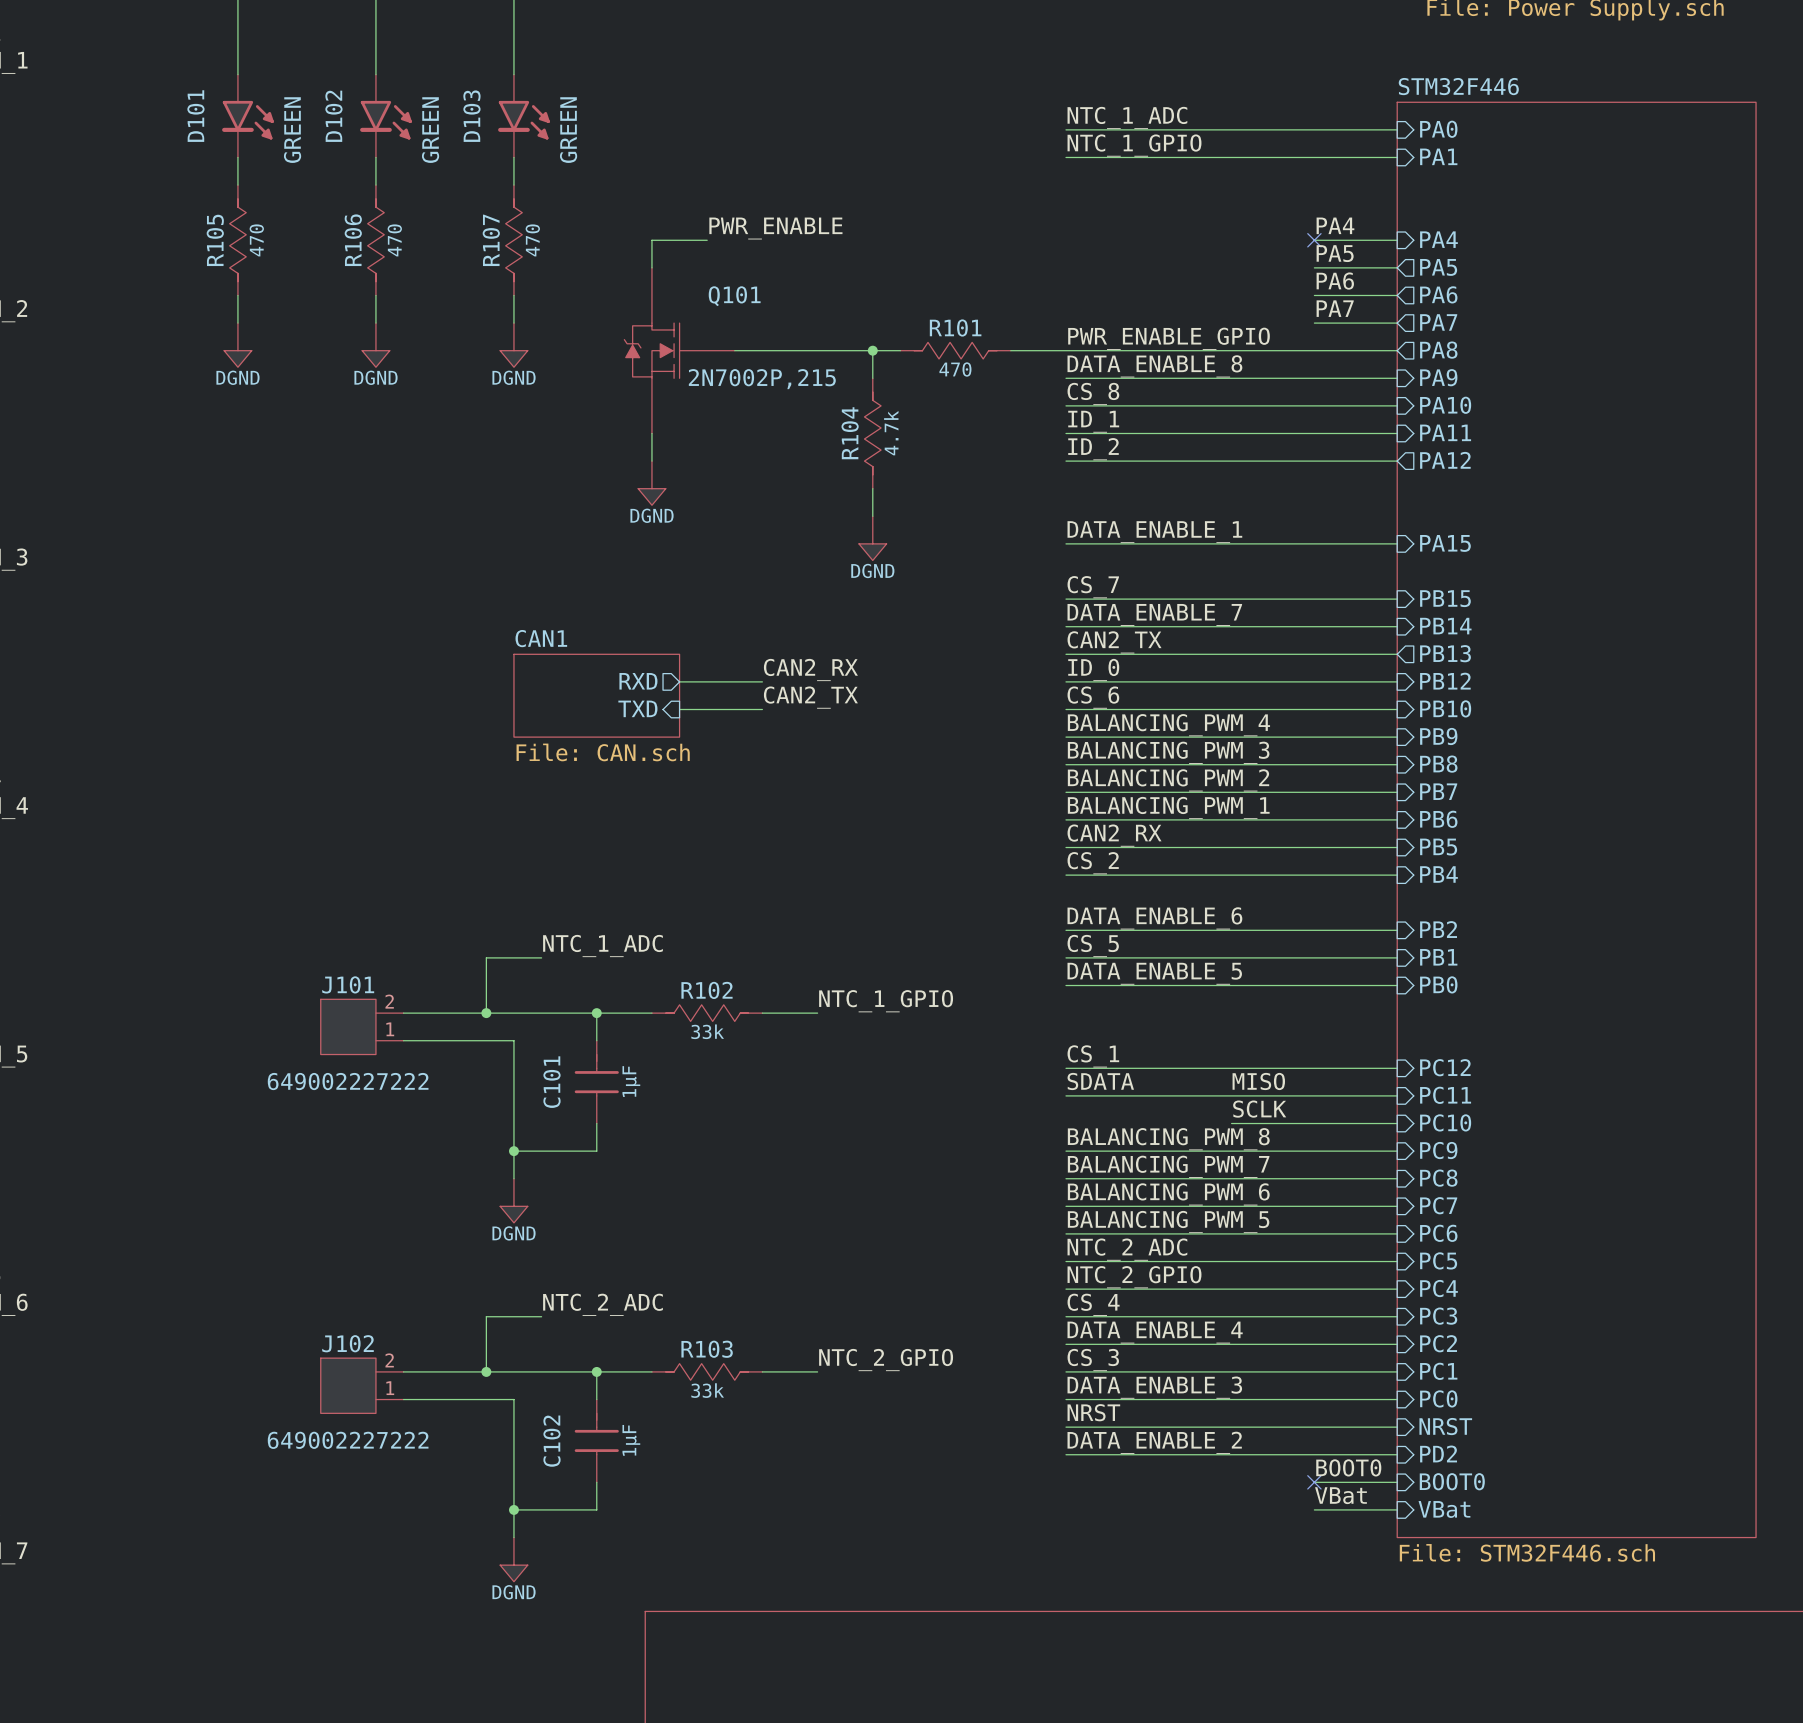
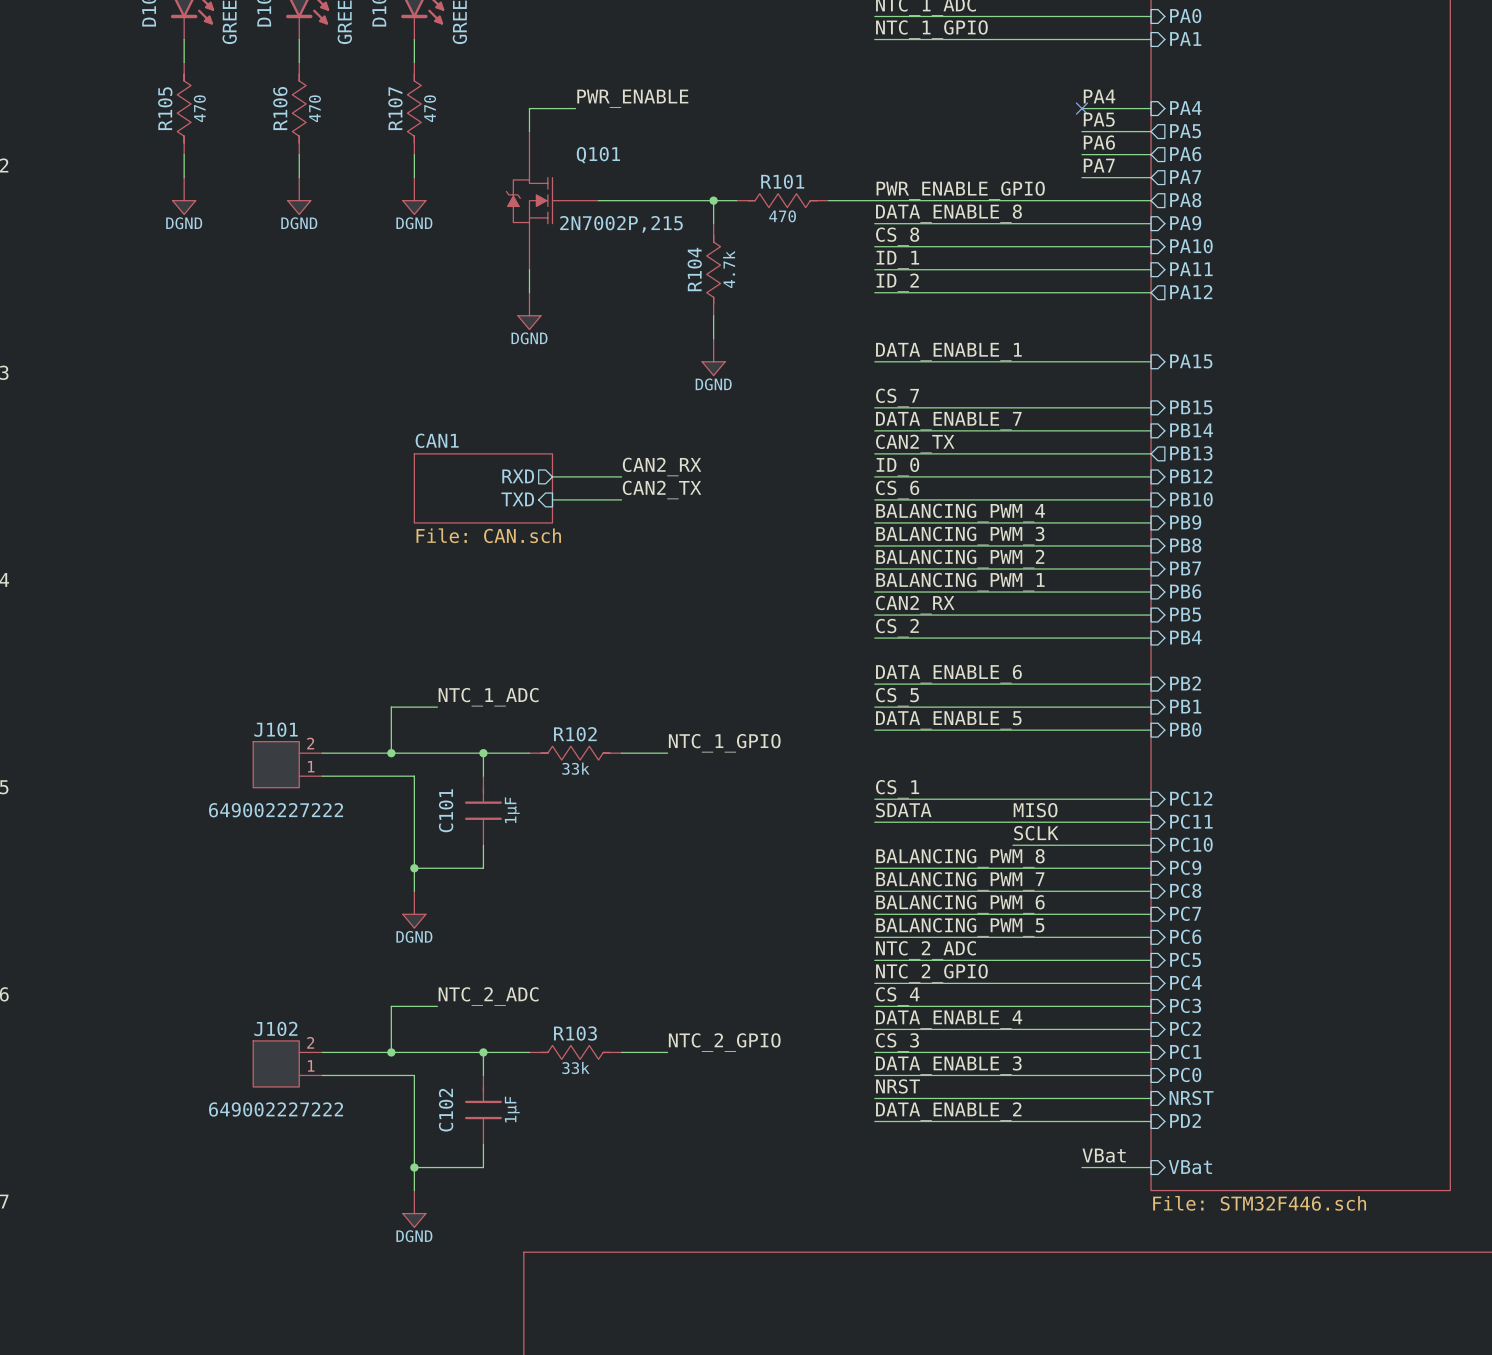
label: BOOT0 (1348, 1467) -> none
sheet pin: BOOT0 (1452, 1481) -> none
wire: (1314, 1482) (1397, 1482) -> none
no-connect mark: (1314, 1482) -> none

